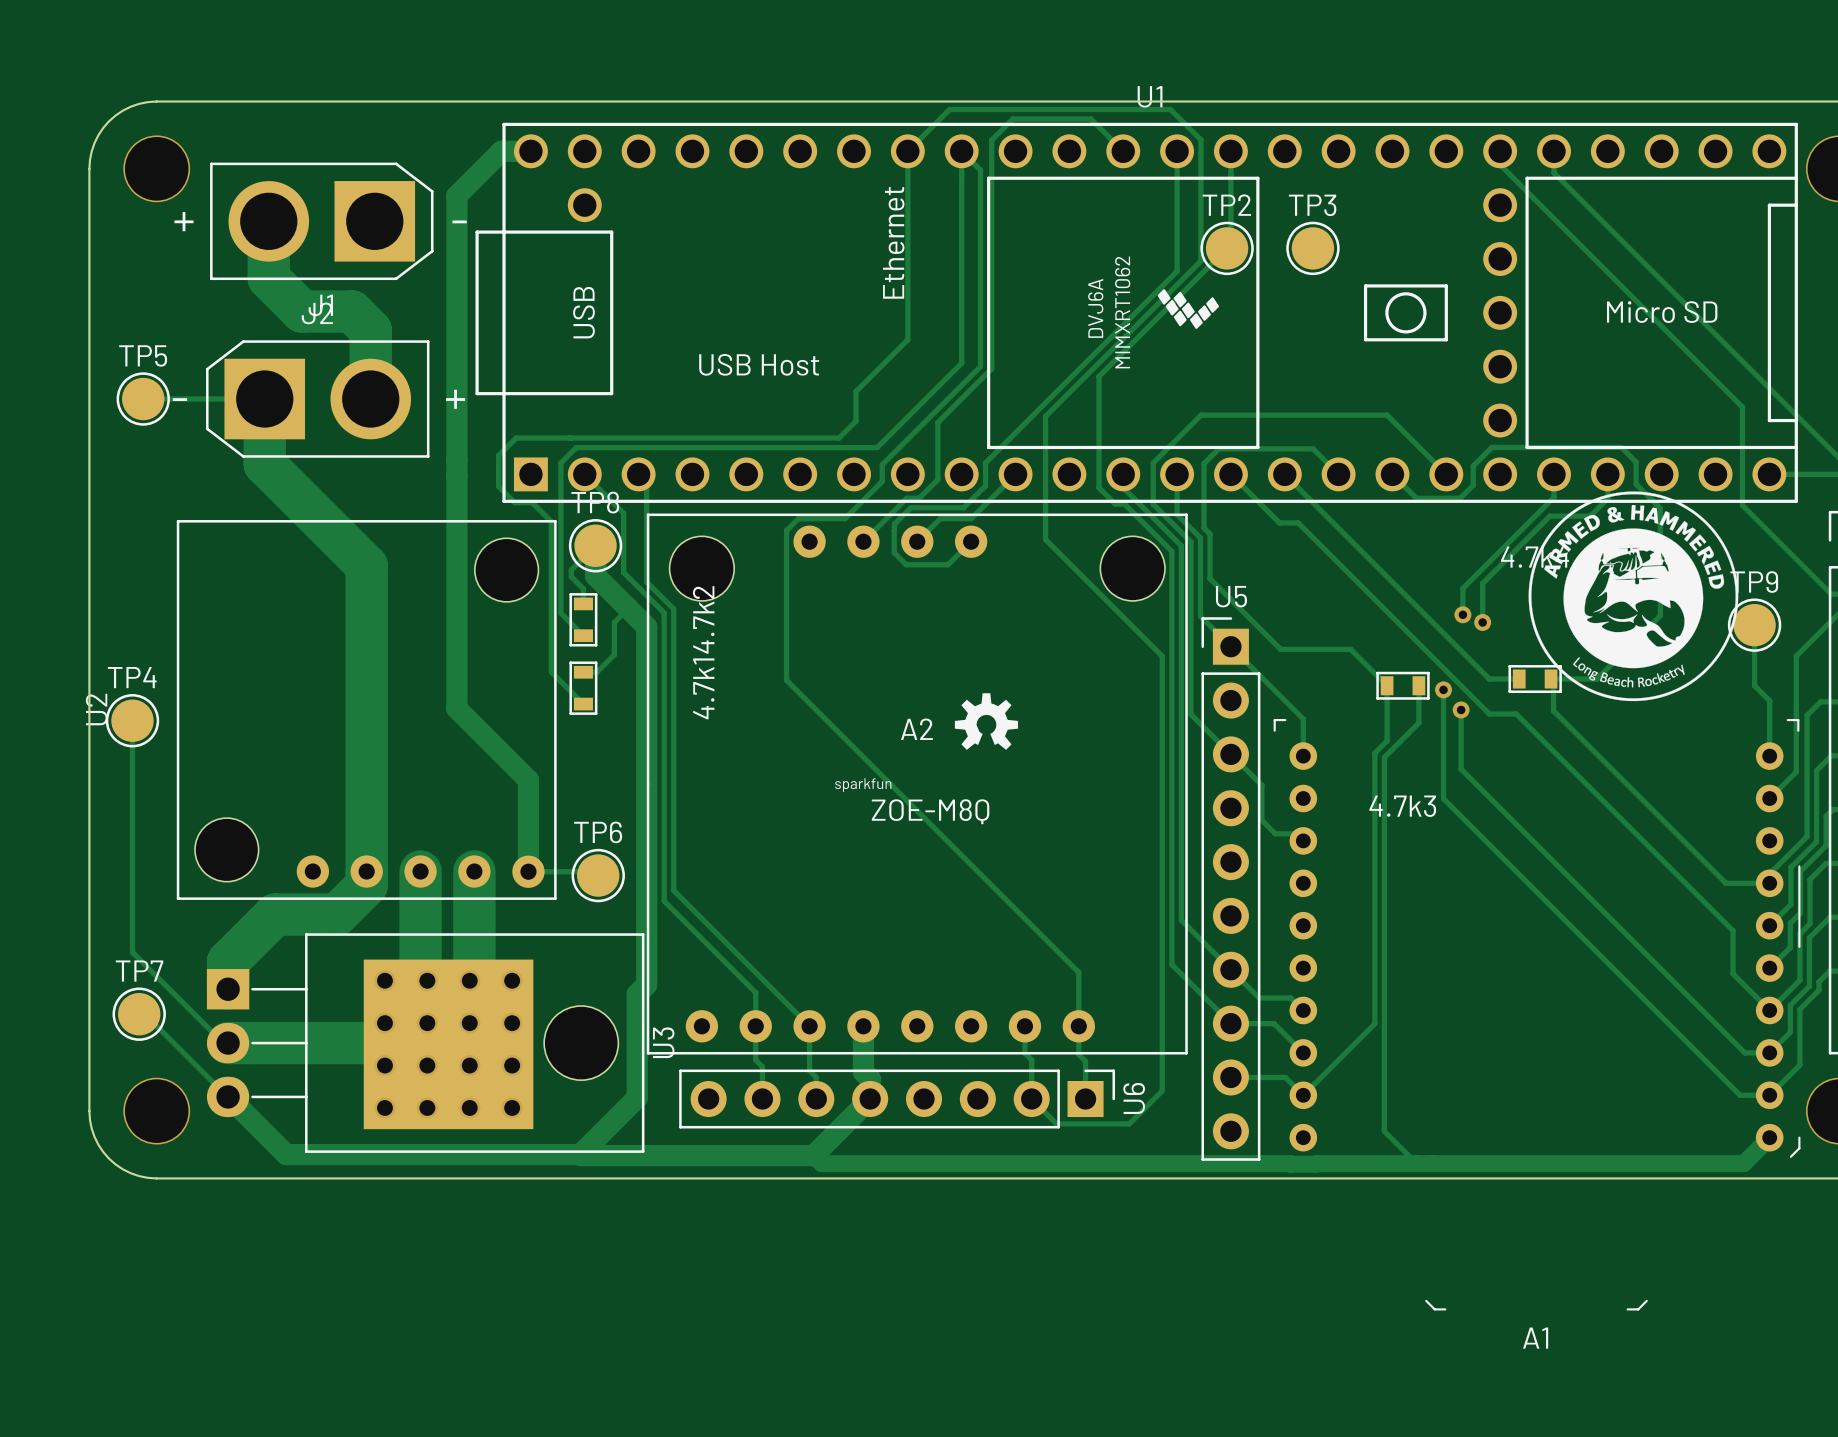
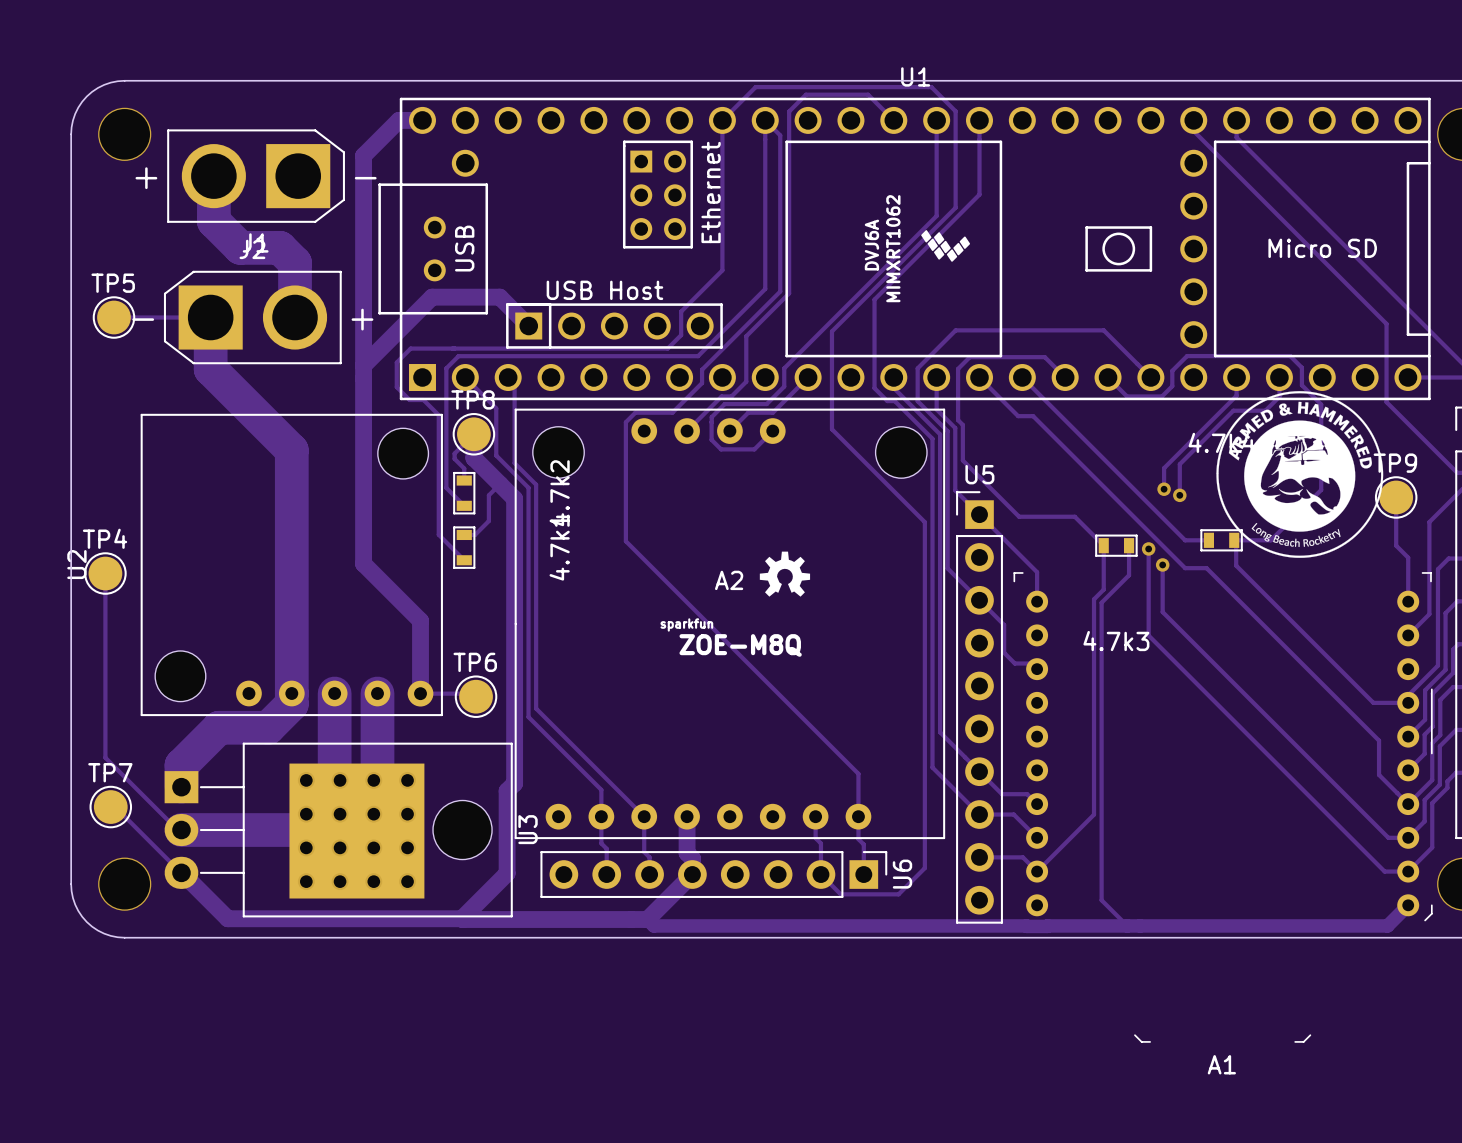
U1 footprint: [475, 122, 1798, 503] -> [378, 97, 1431, 401]
TP2: (1227, 248) -> none
TP3: (1312, 248) -> none
track: none -> (528, 326) (499, 297) (432, 297) (363, 365)

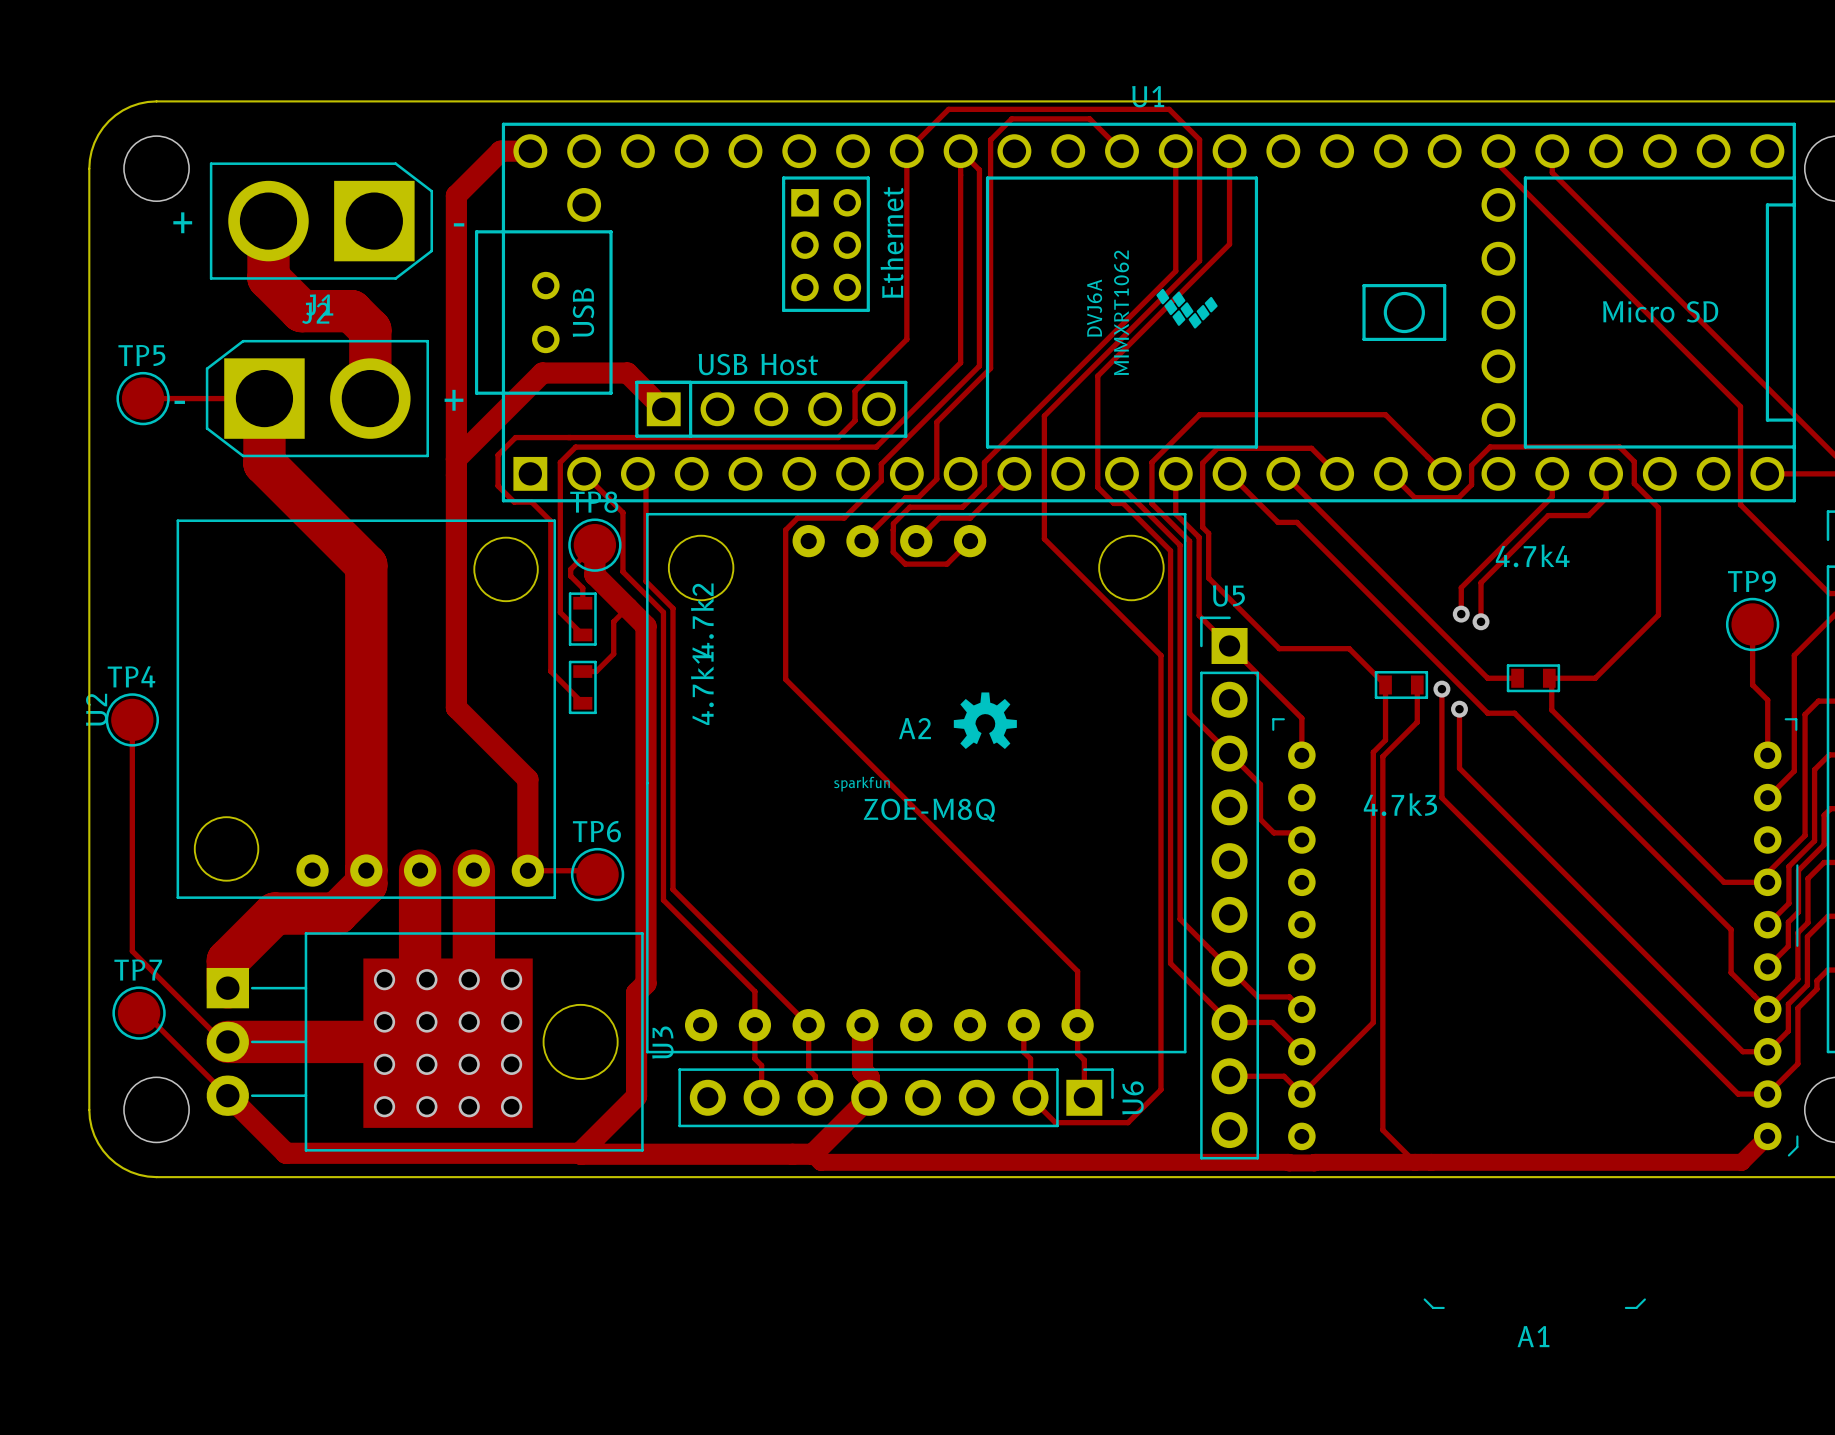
drawing: [1216, 391, 1384, 558] -> none

